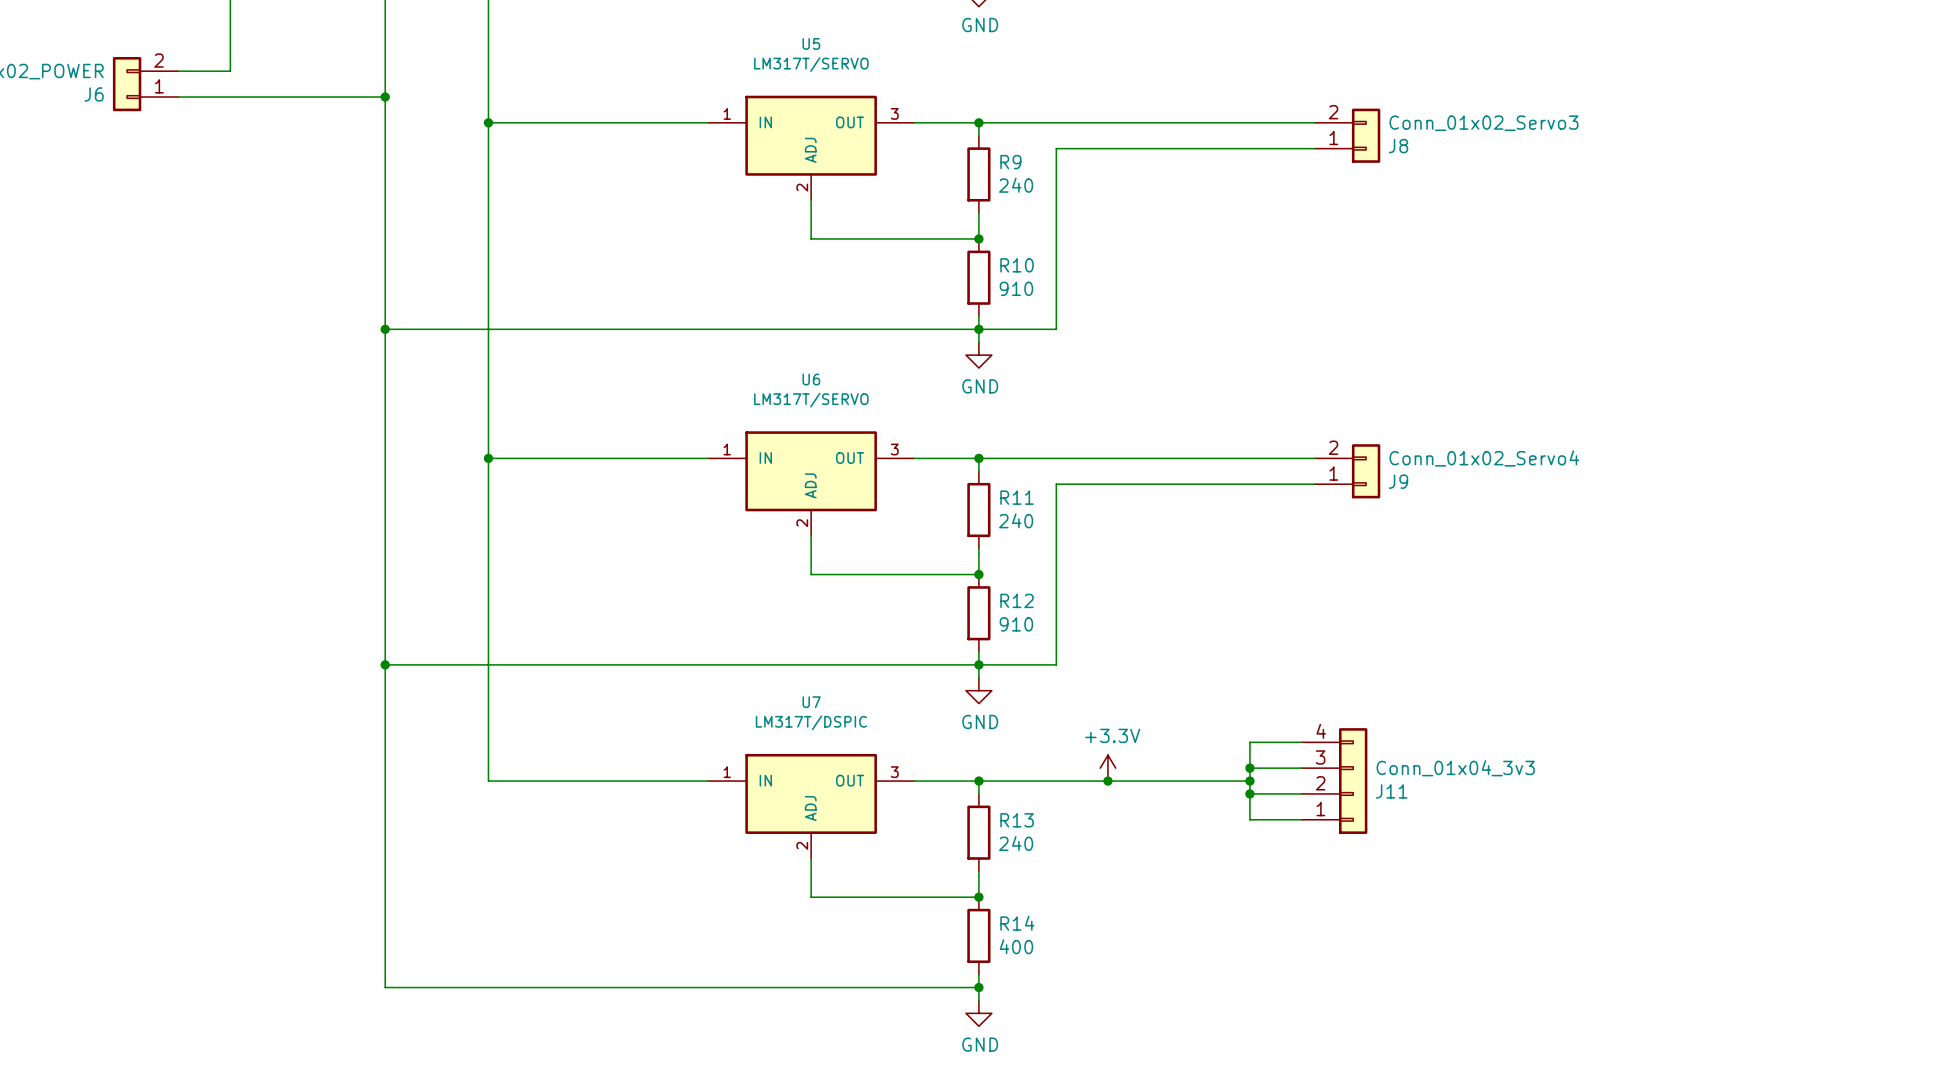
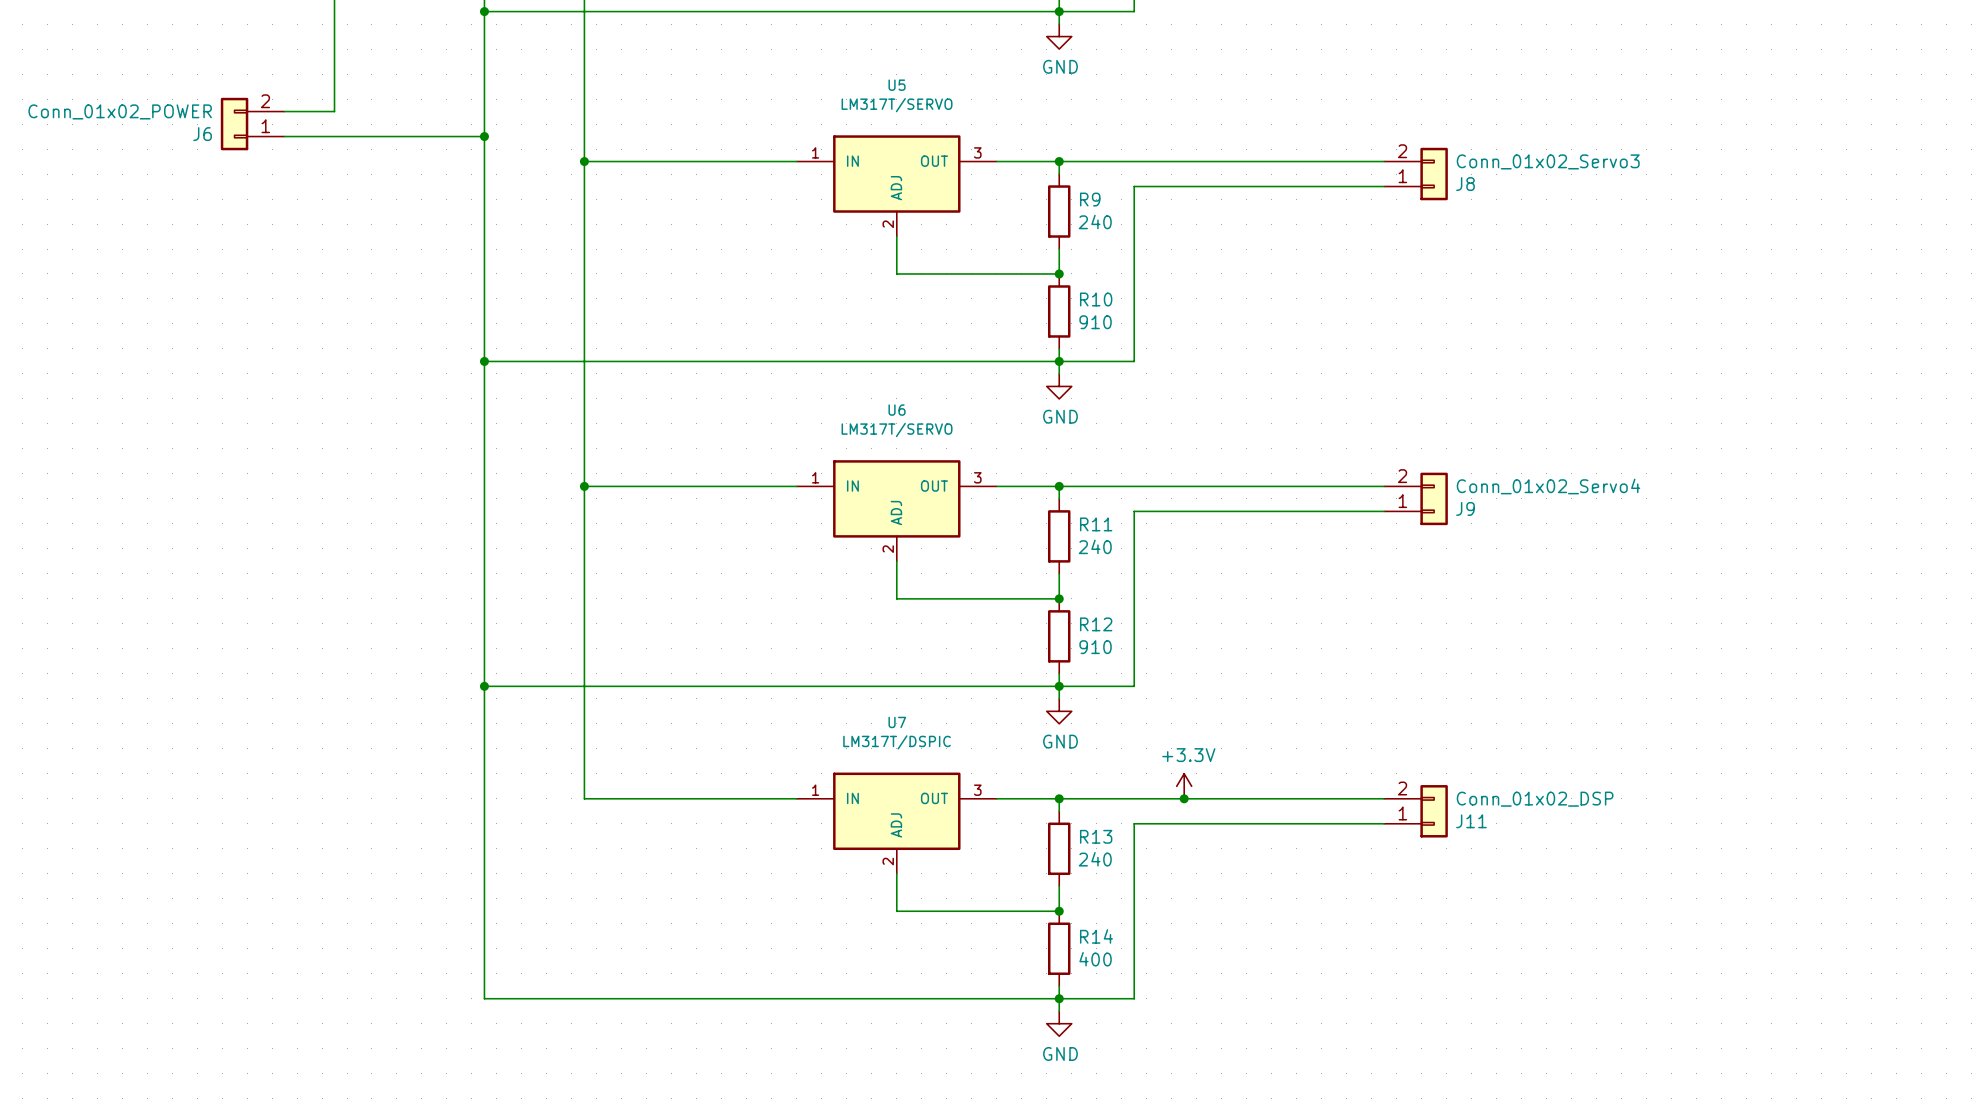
J11 symbol: [1301, 728, 1368, 834] -> [1384, 785, 1448, 838]
wire: (1301, 742) (1249, 742) (1249, 819) (1301, 819) -> none
wire: (1249, 768) (1301, 768) -> none
junction: (1249, 768) -> none
J11 value: Conn_01x04_3v3 (1455, 768) -> Conn_01x02_DSP (1535, 799)
wire: none -> (1321, 798) (1384, 798)
junction: (1249, 781) -> none
wire: (1249, 793) (1301, 793) -> none
junction: (1249, 793) -> none
wire: none -> (1384, 823) (1134, 823) (1134, 998) (1059, 998)

